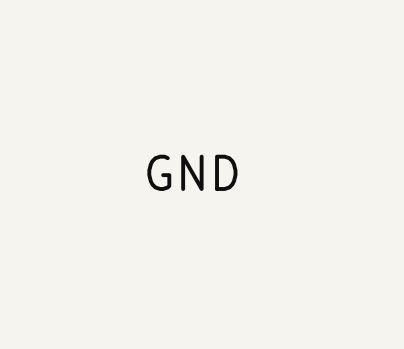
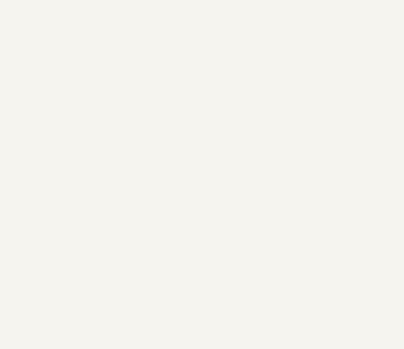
label: GND (192, 172) -> none

